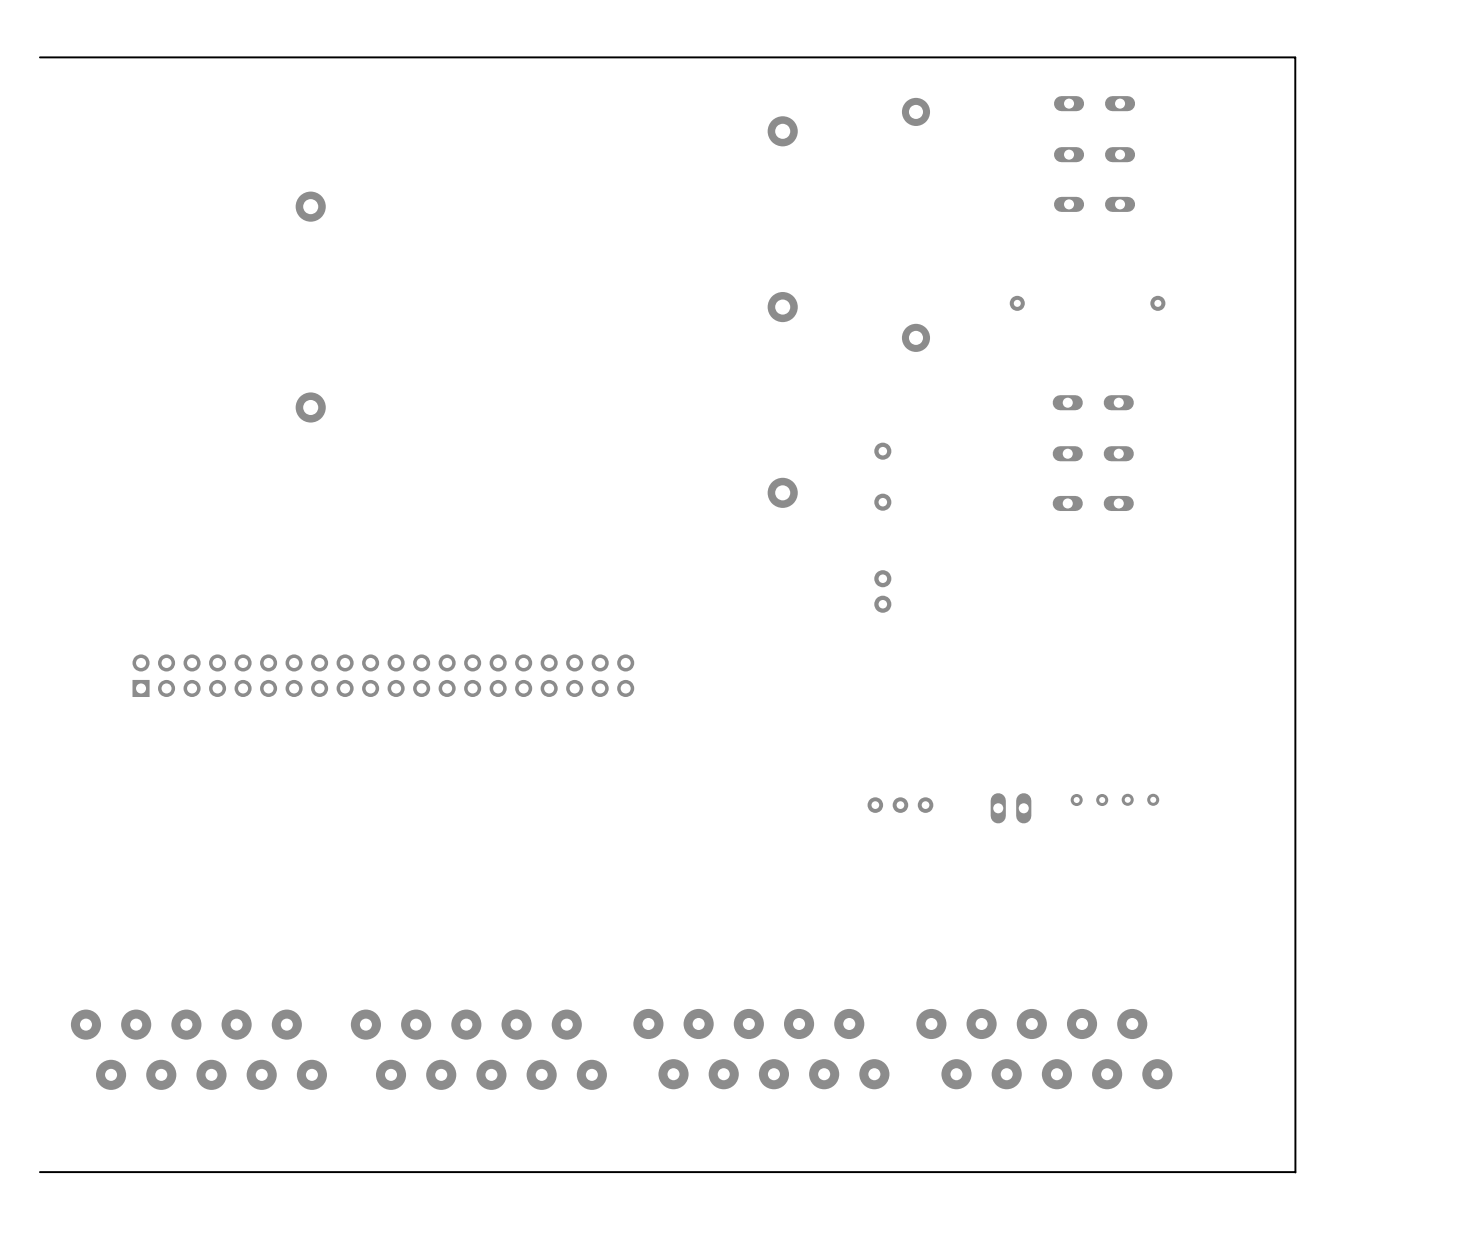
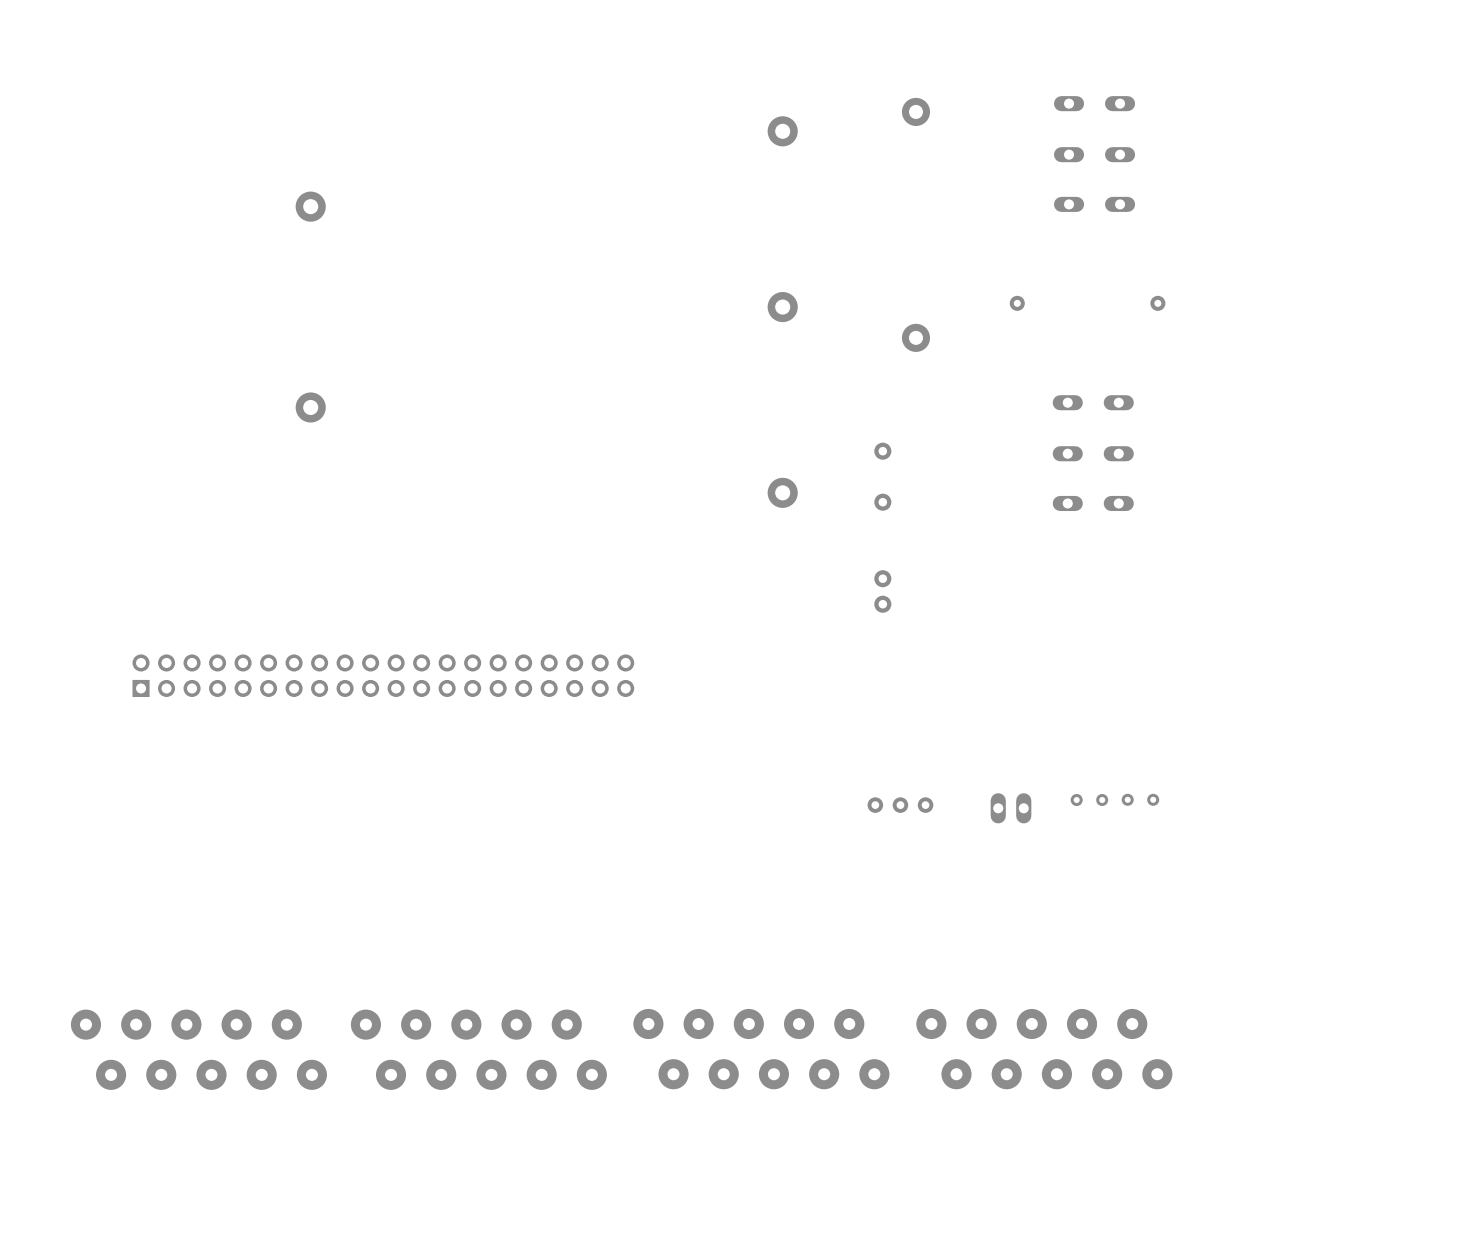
board edge: (1295, 57) (39, 57) -> none
board edge: (1295, 57) (1295, 1172) -> none
board edge: (1295, 1172) (39, 1172) -> none

